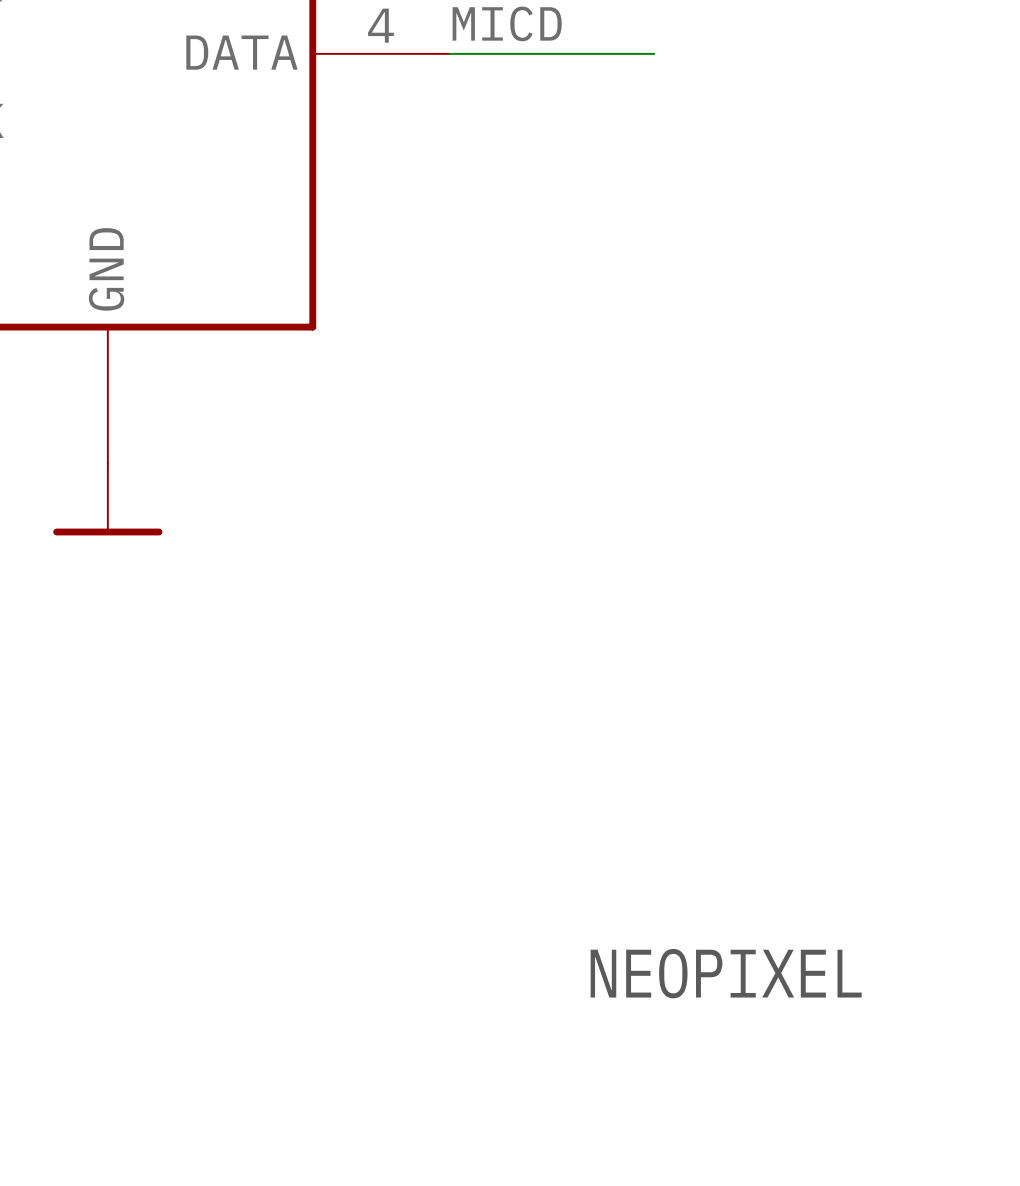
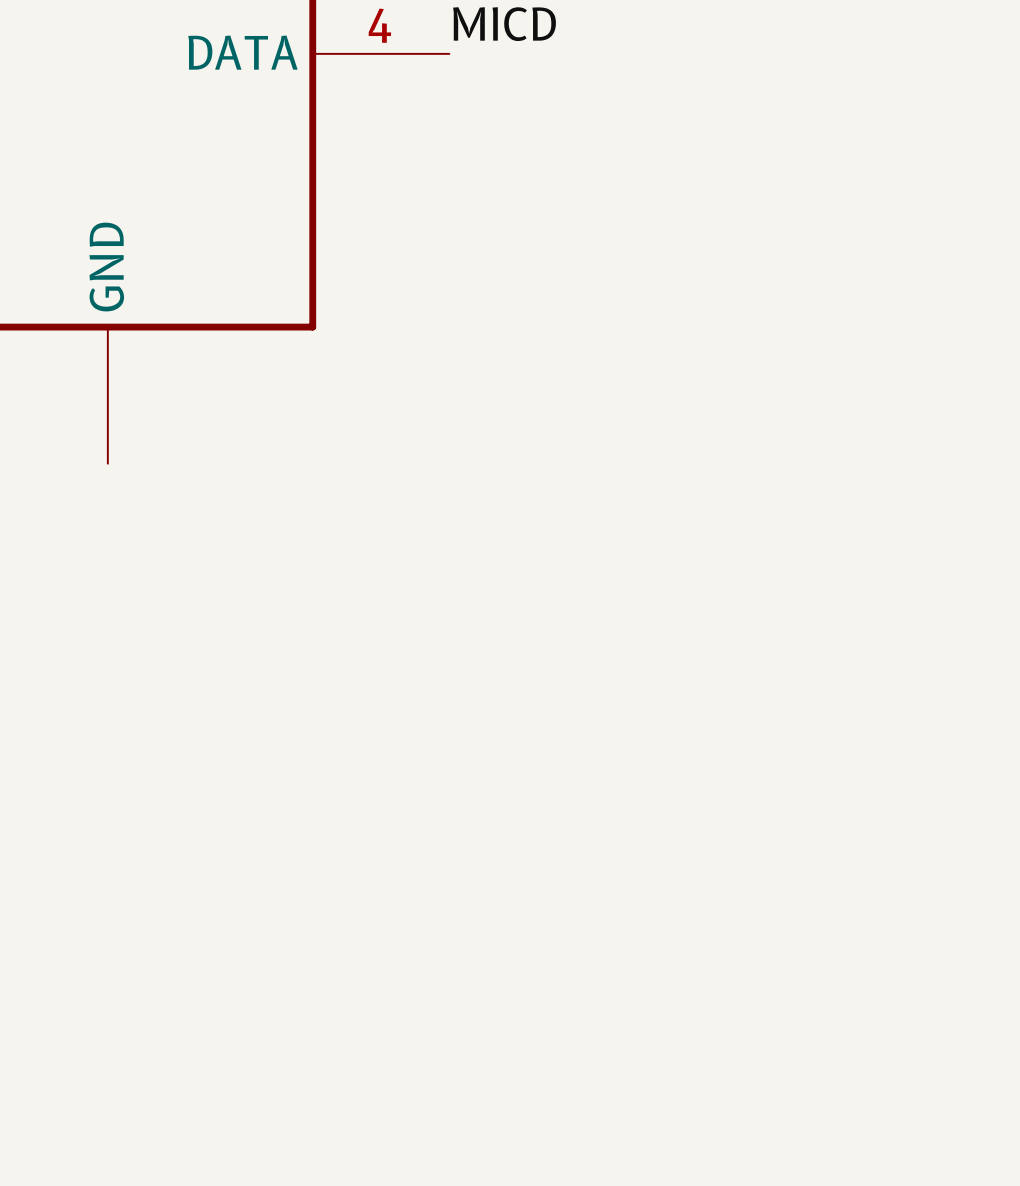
wire: (449, 53) (654, 53) -> none
power symbol: (107, 499) -> none
text: NEOPIXEL (726, 973) -> none

